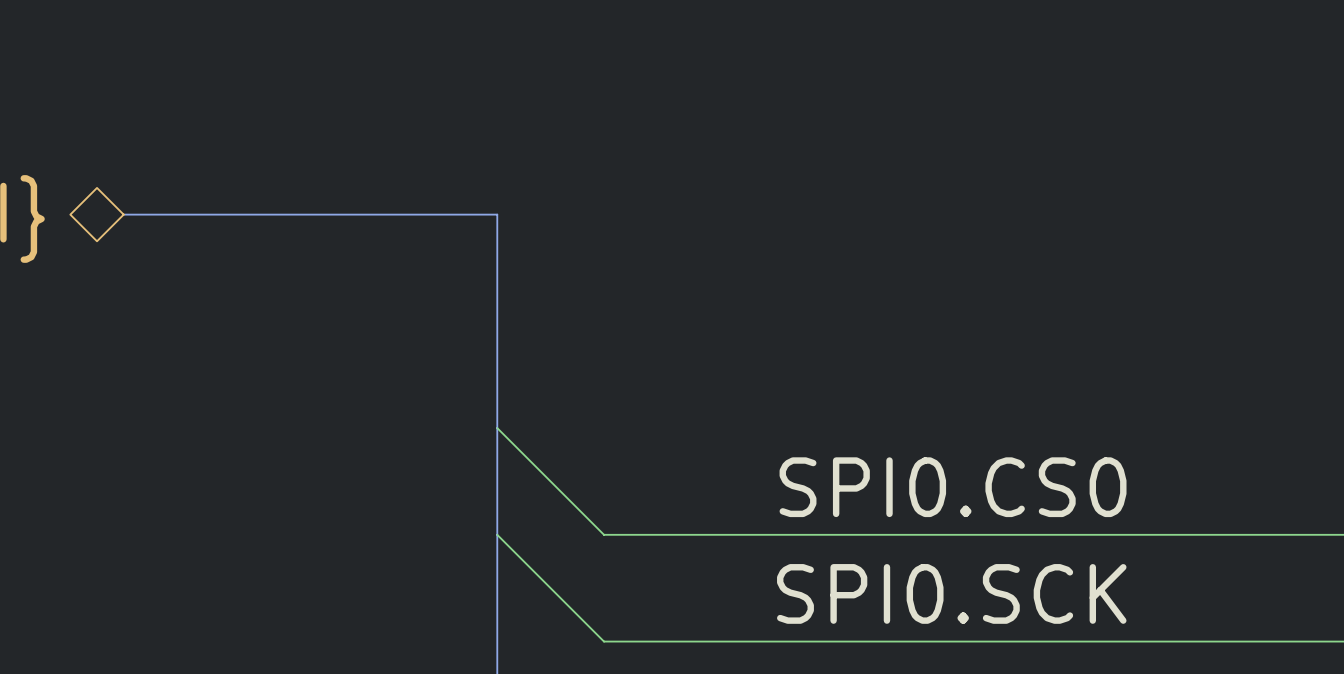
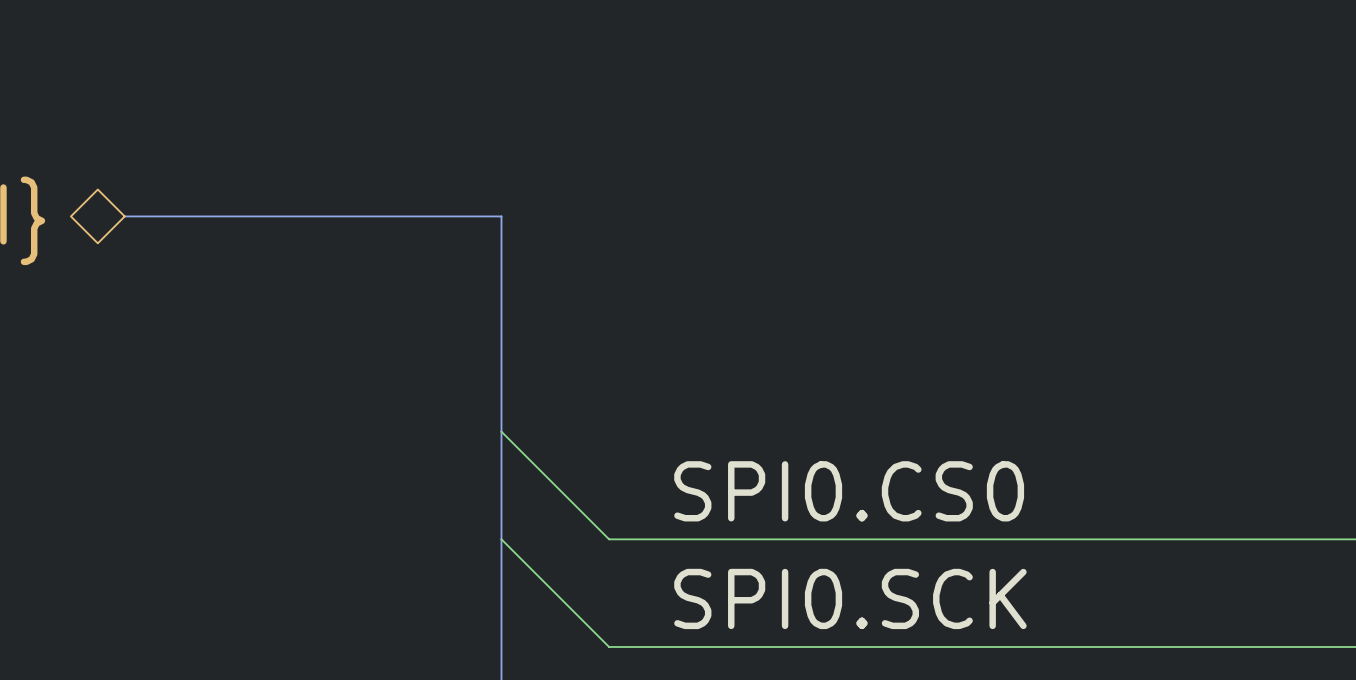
label position: SPI0.CS0 (953, 487) -> SPI0.CS0 (849, 491)
label position: SPI0.SCK (951, 593) -> SPI0.SCK (850, 598)

